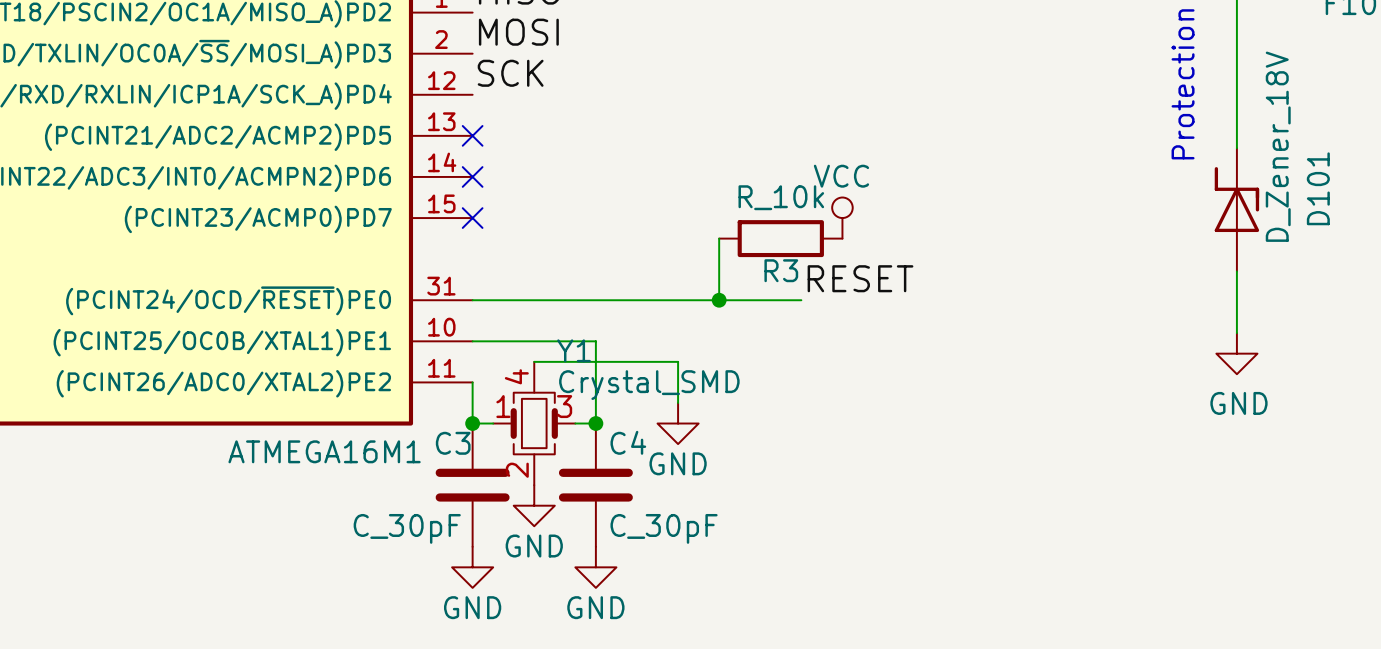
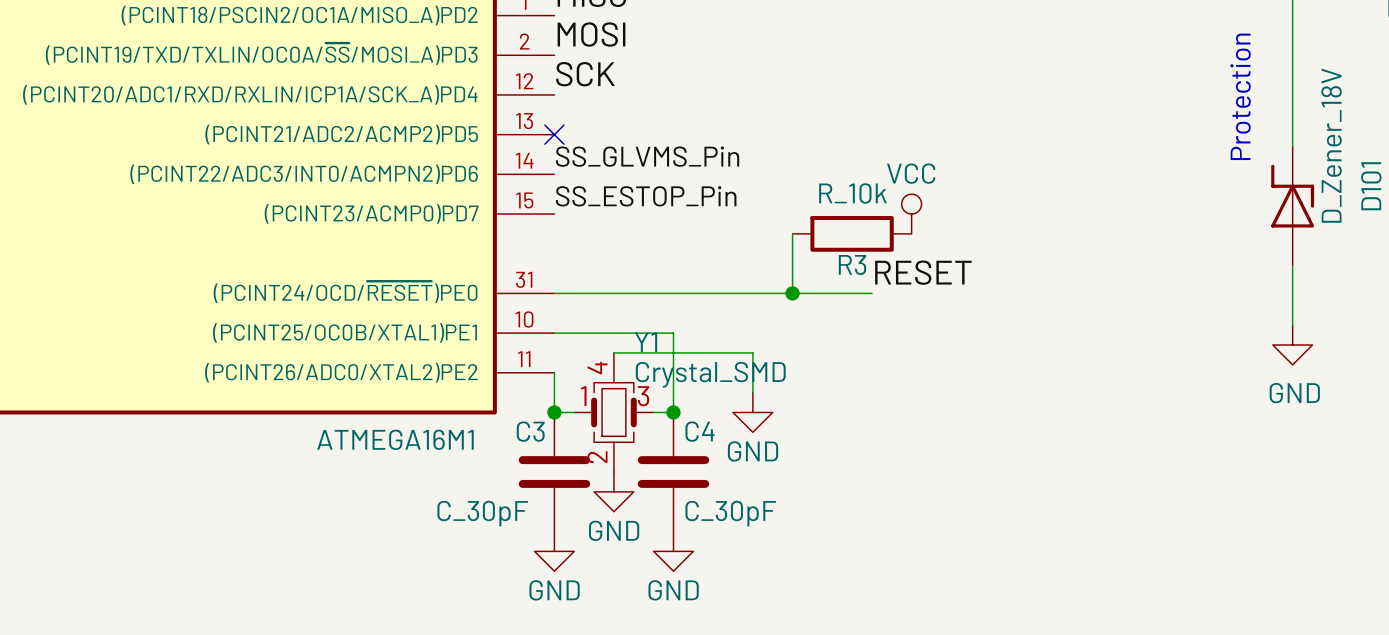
label: none -> SS_GLVMS_Pin (647, 156)
no-connect mark: (472, 176) -> none
label: none -> SS_ESTOP_Pin (646, 196)
no-connect mark: (472, 218) -> none

